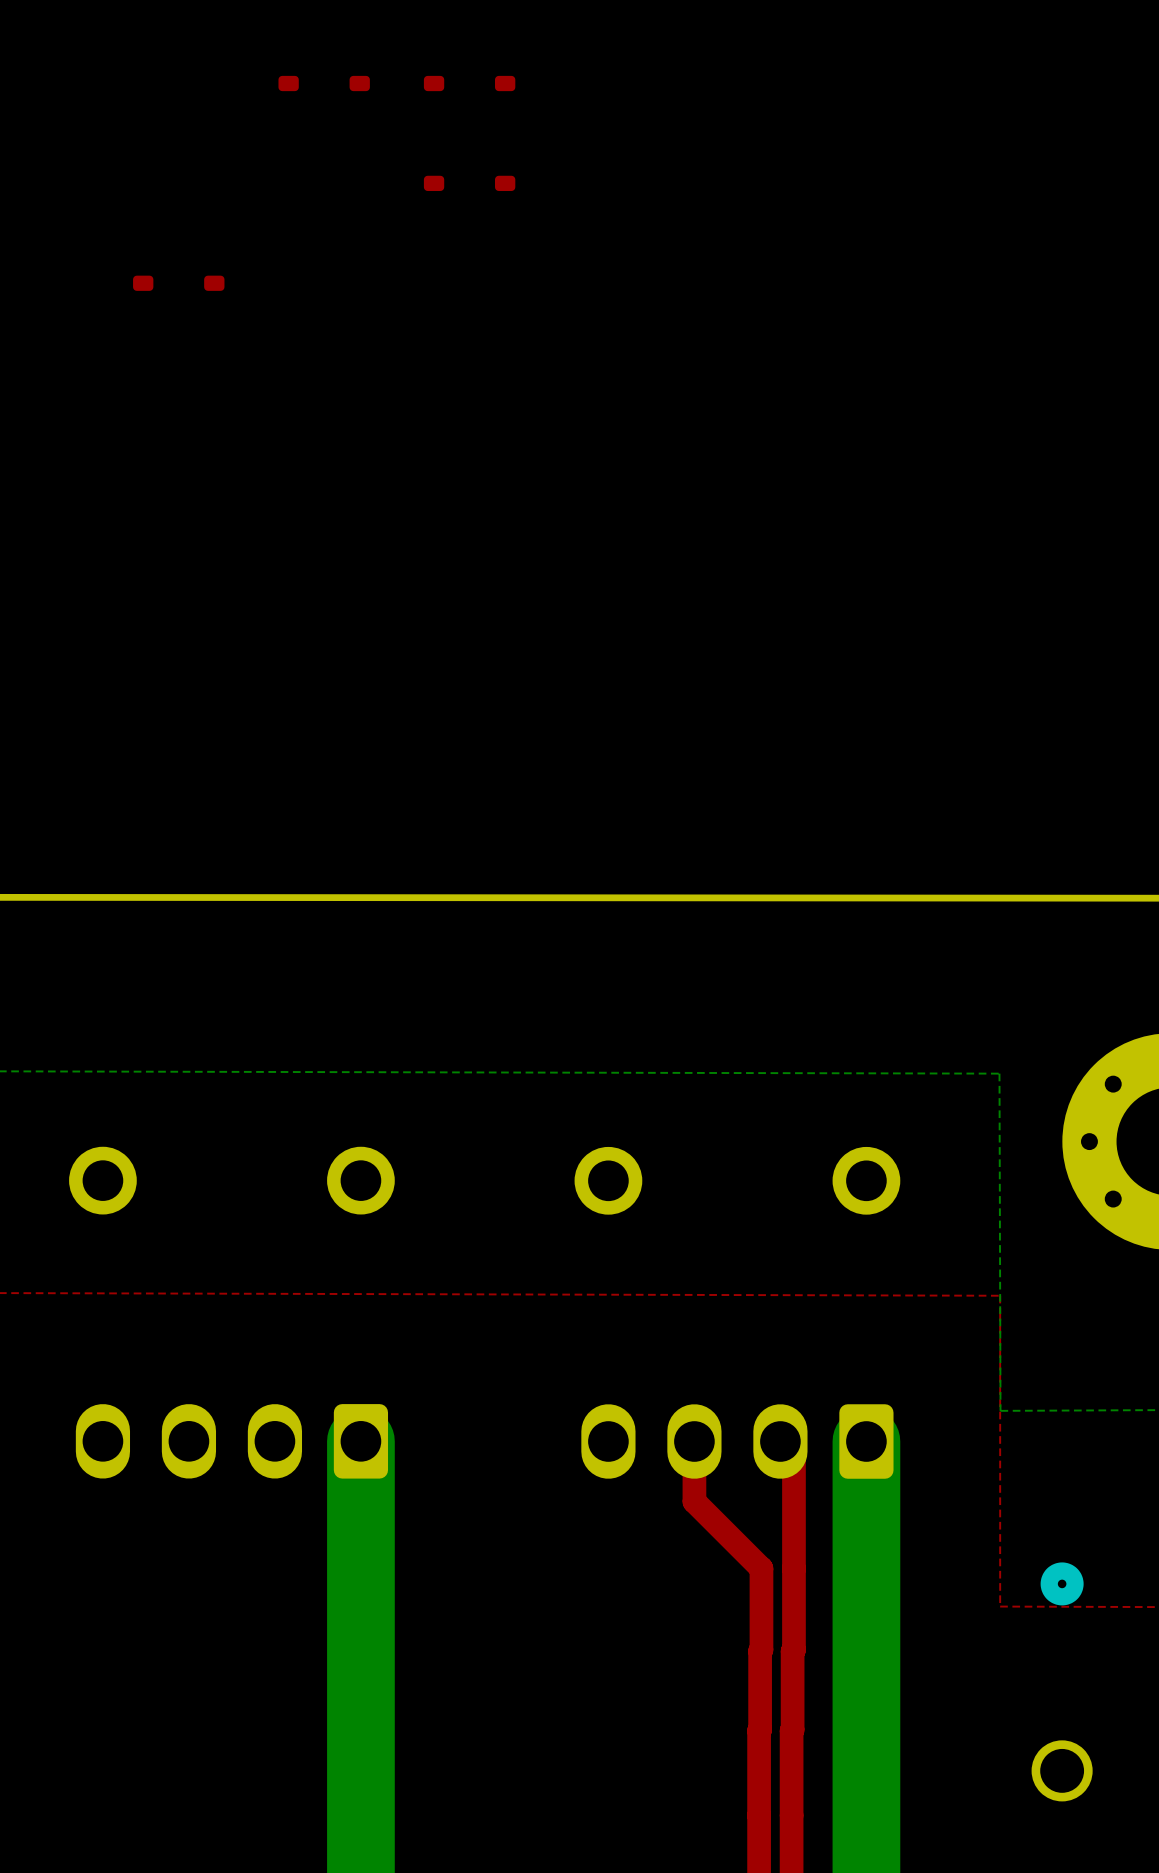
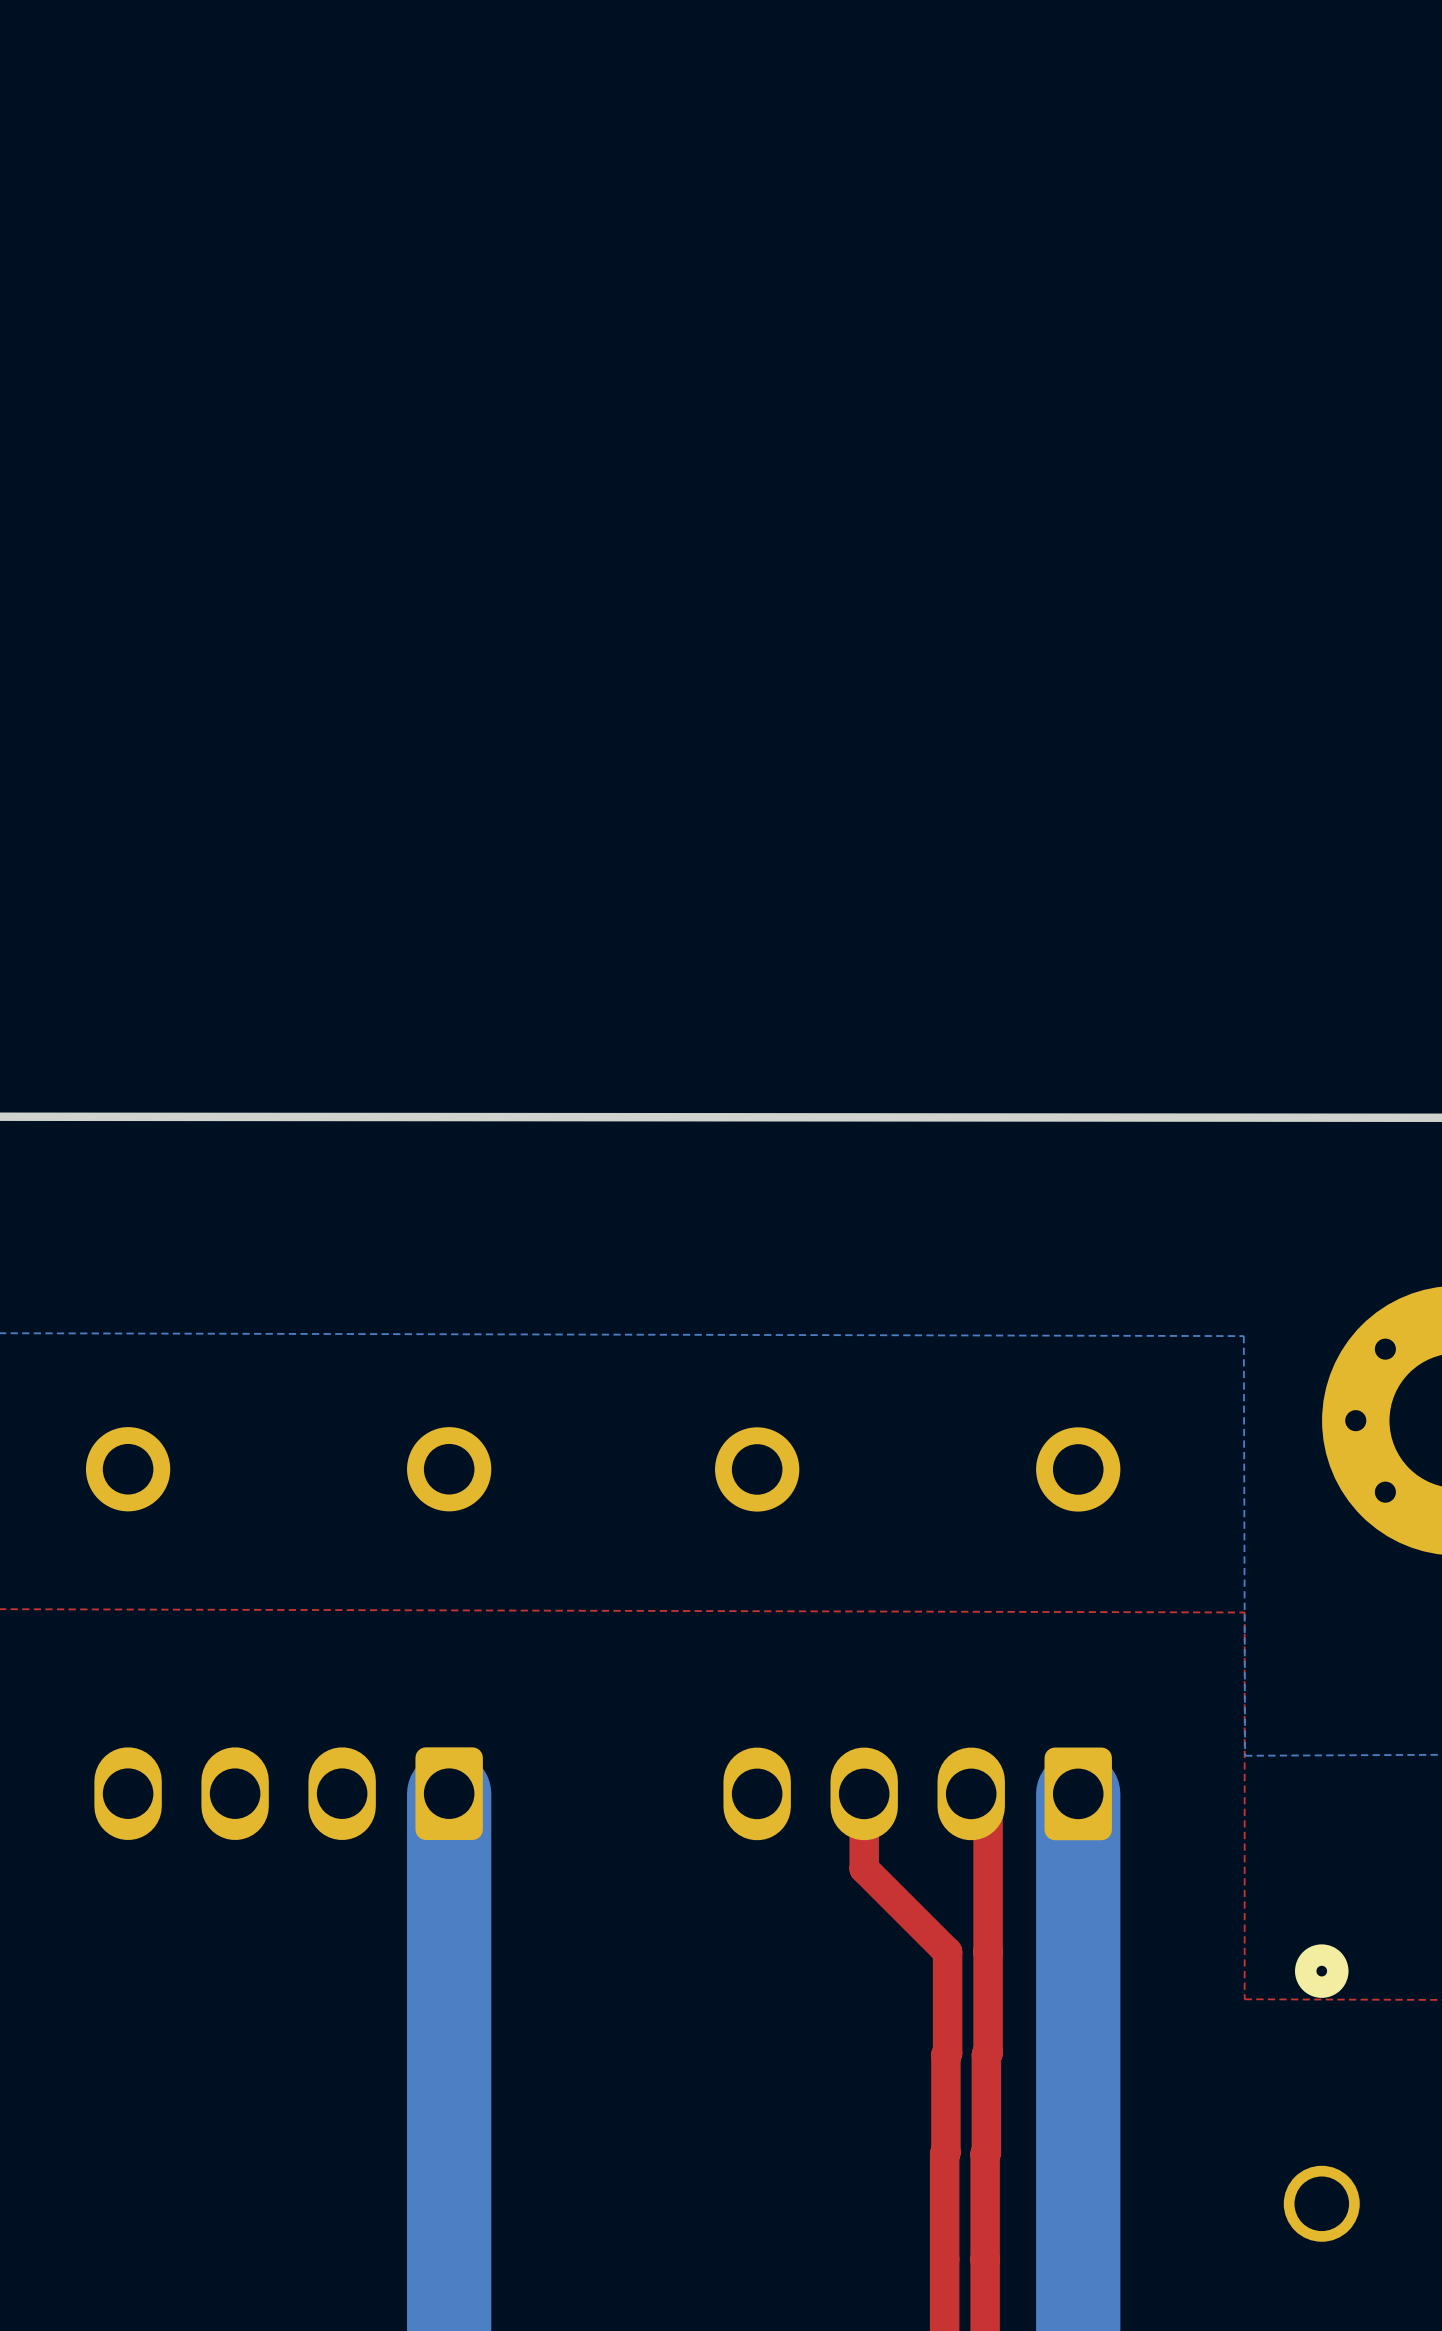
part: (324, 83) -> none
part: (469, 83) -> none
part: (469, 183) -> none
part: (178, 283) -> none

